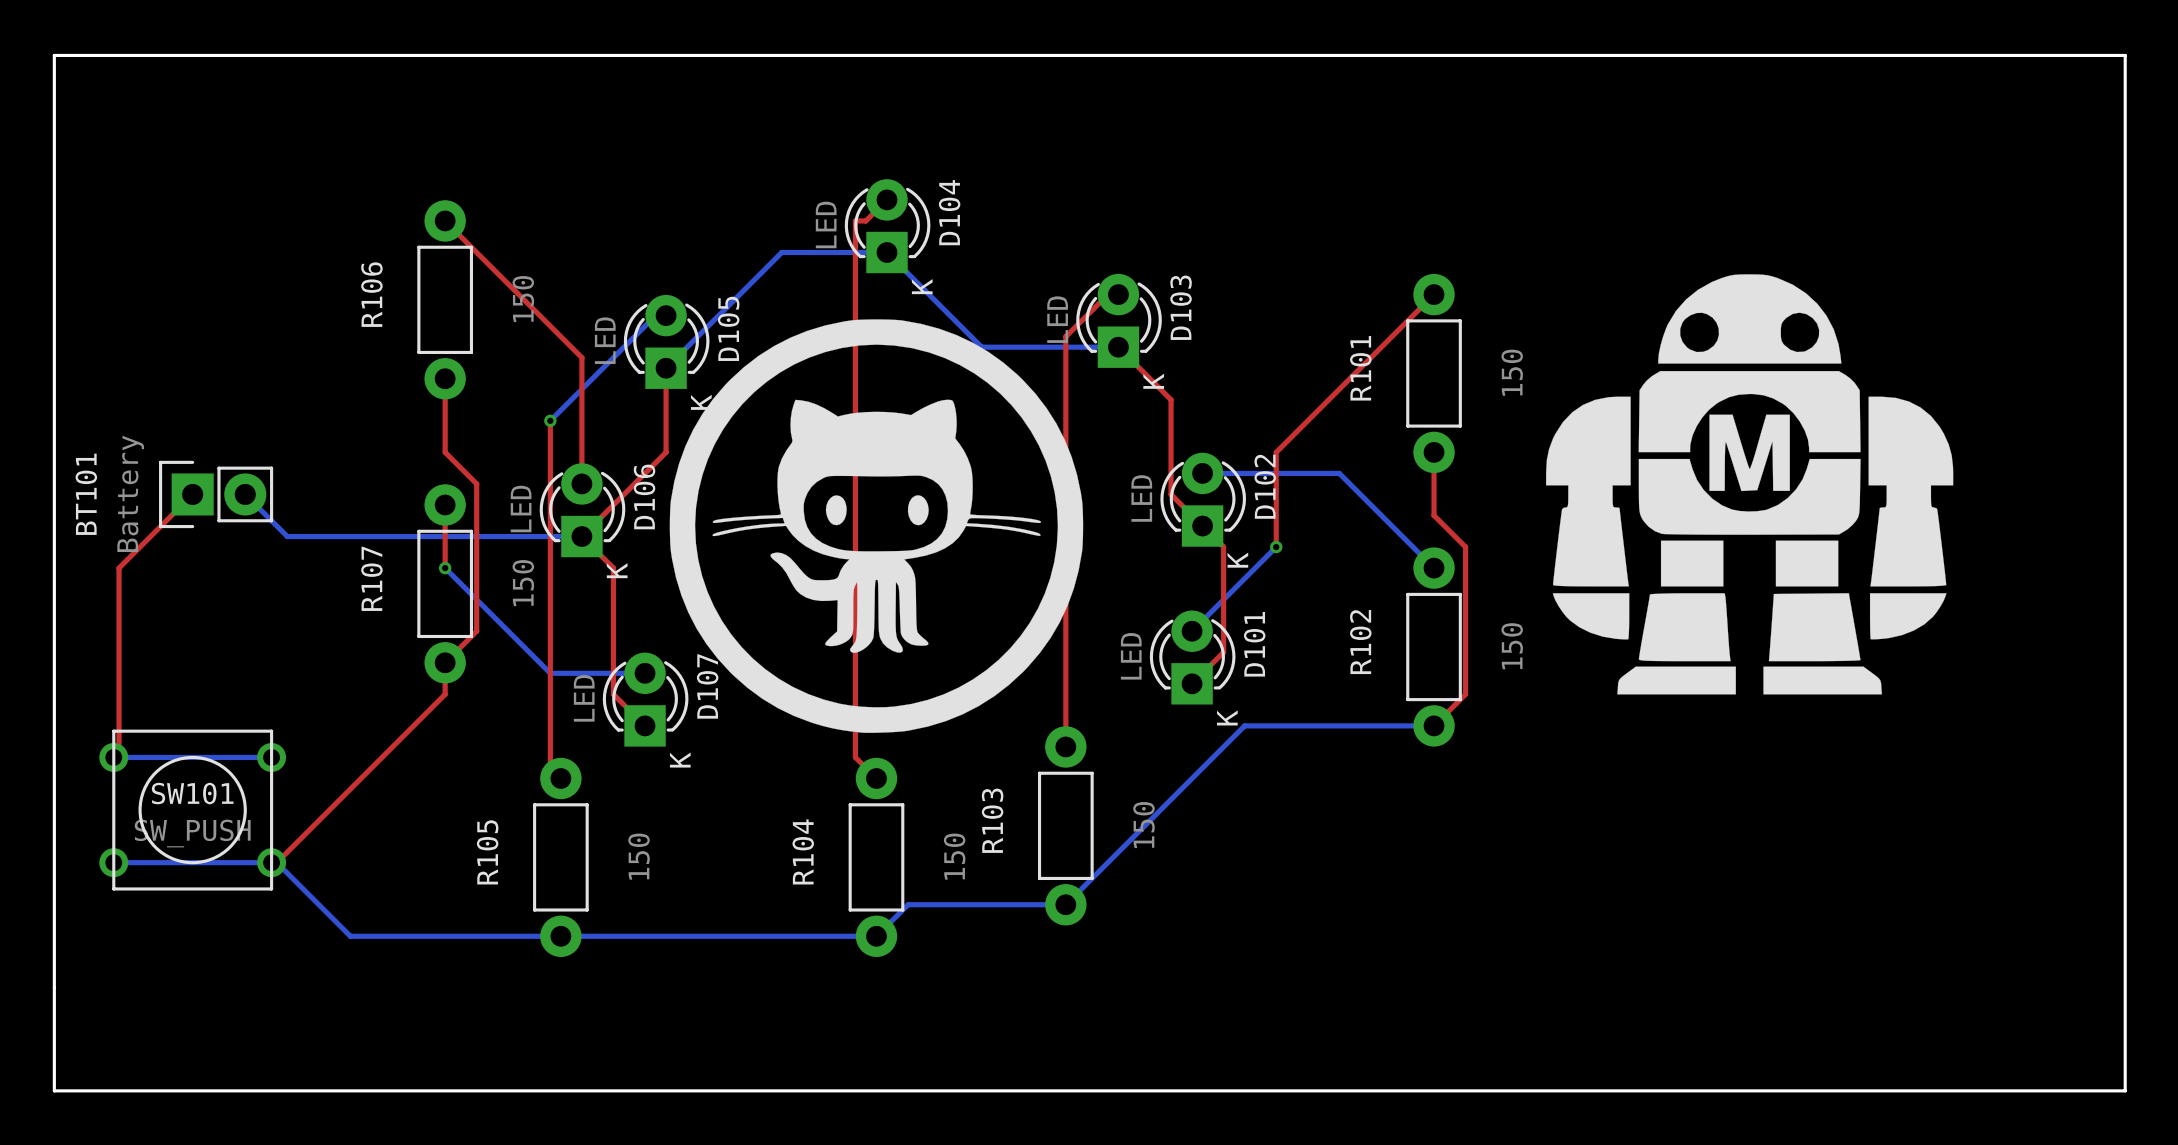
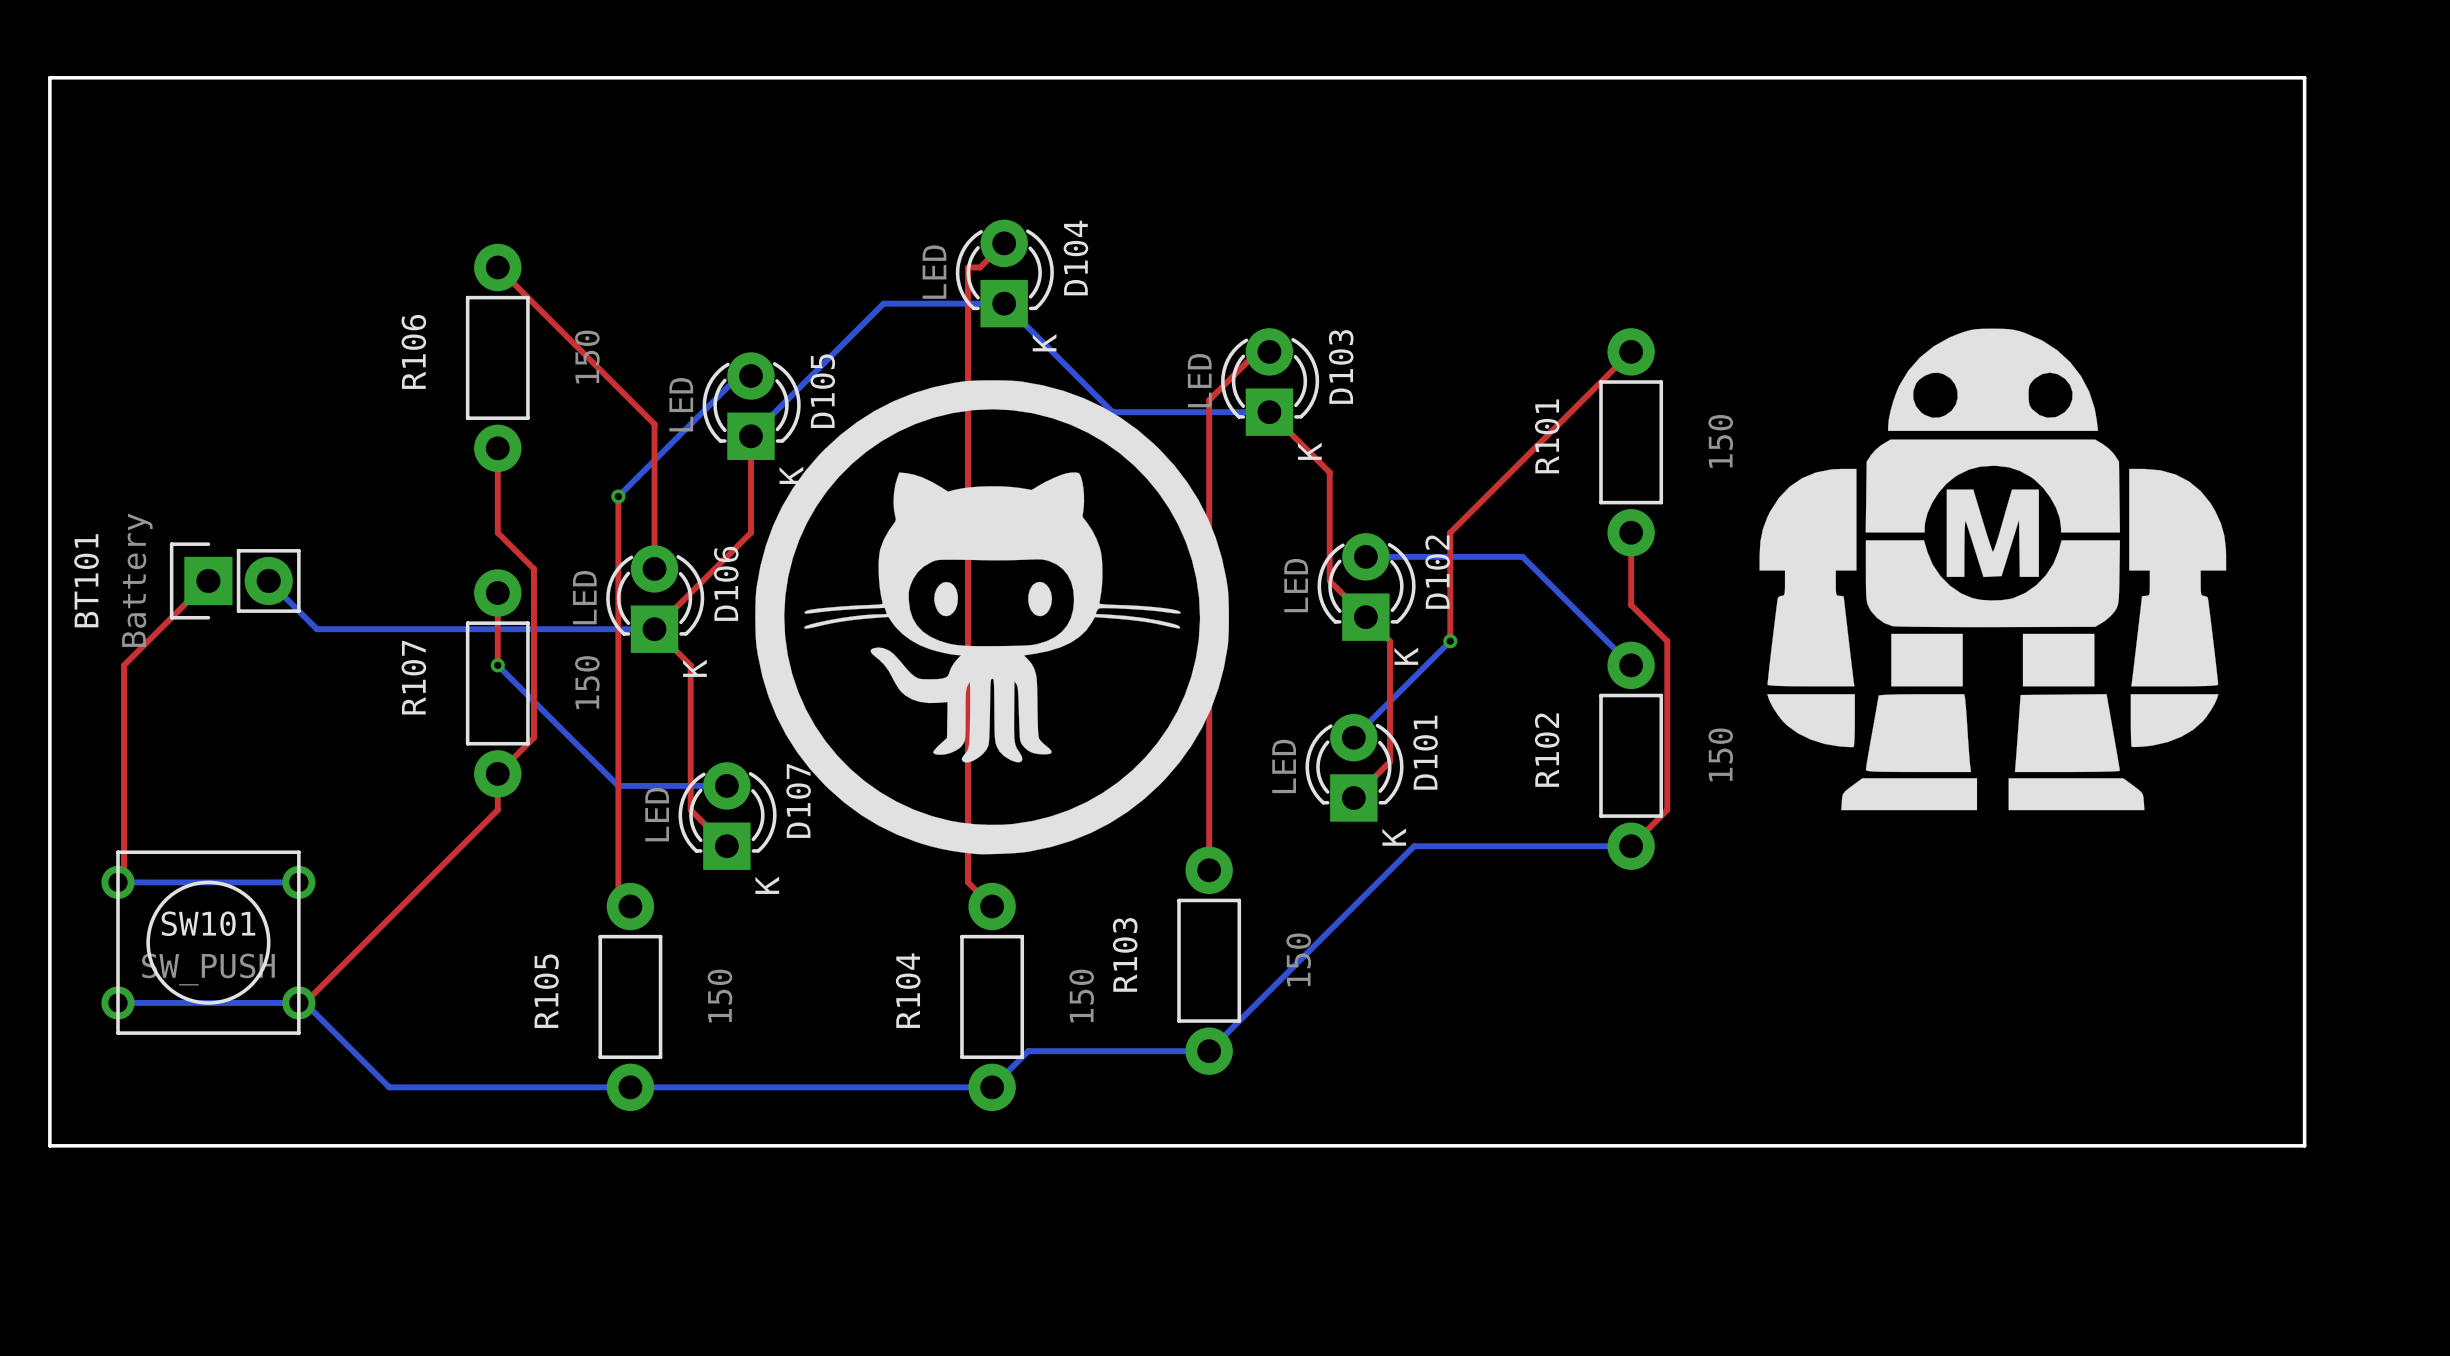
board edge: (2021, 55) (2125, 55) (2125, 1090) (54, 1090) (54, 987) -> (2304, 77) (2304, 1145) (49, 1145)

